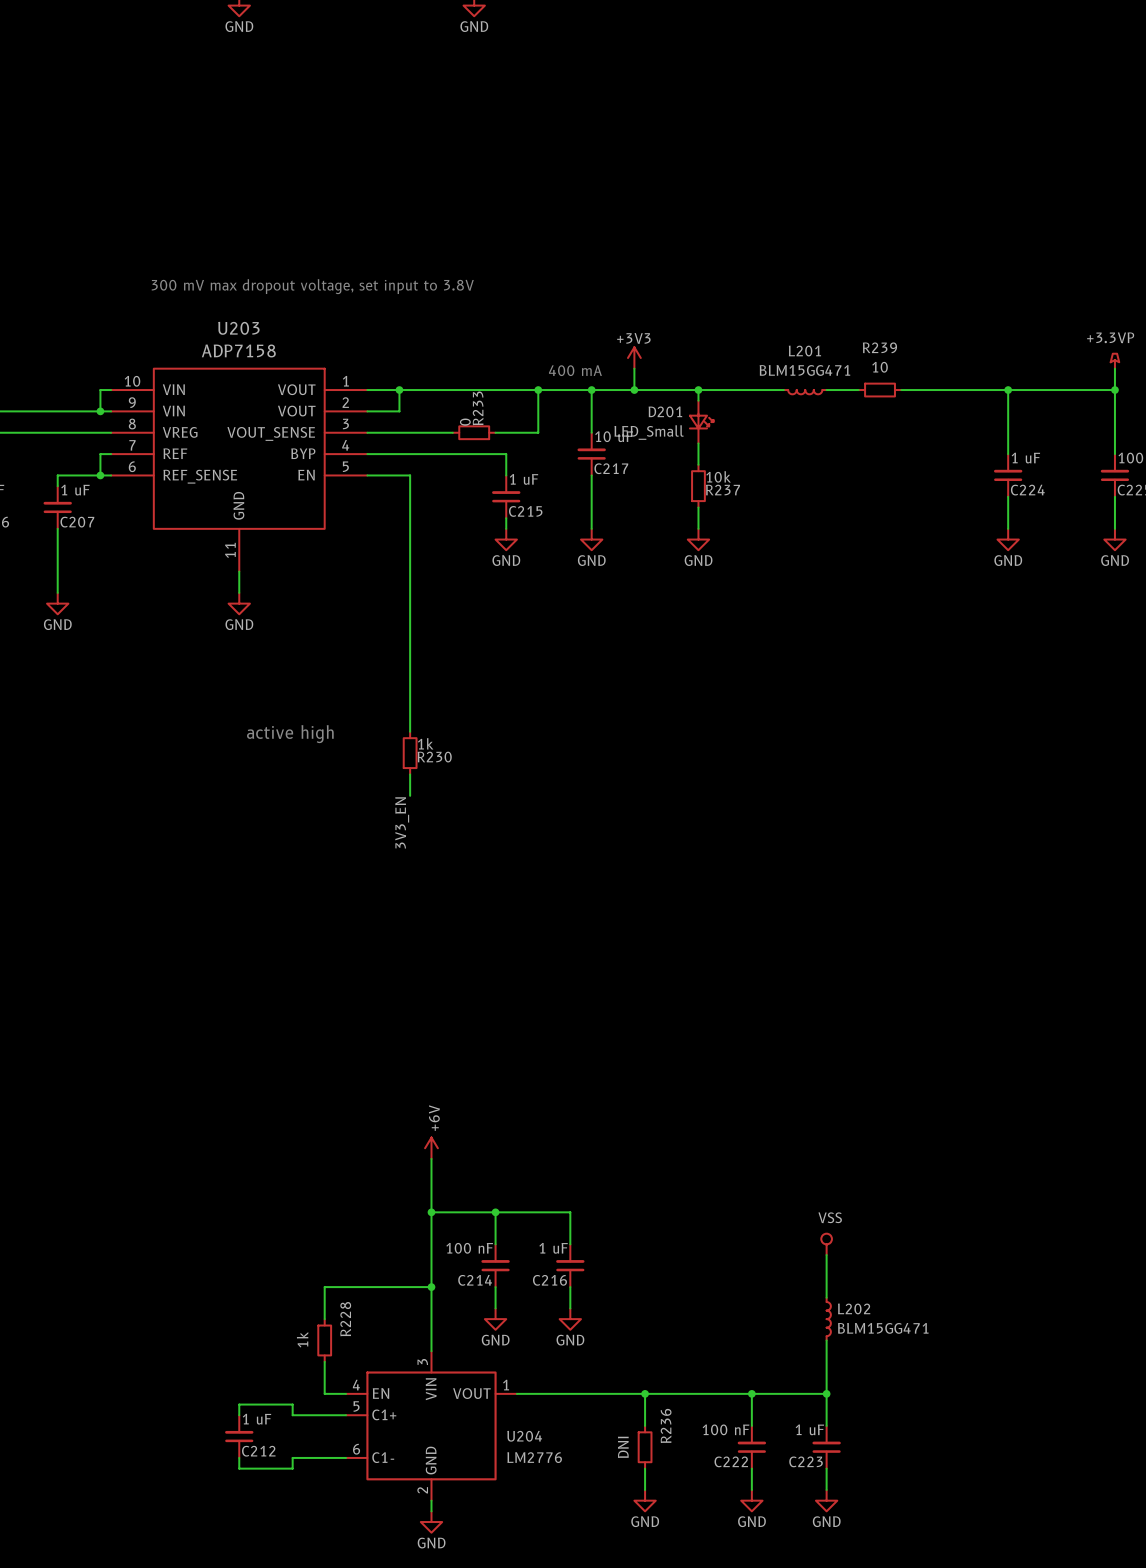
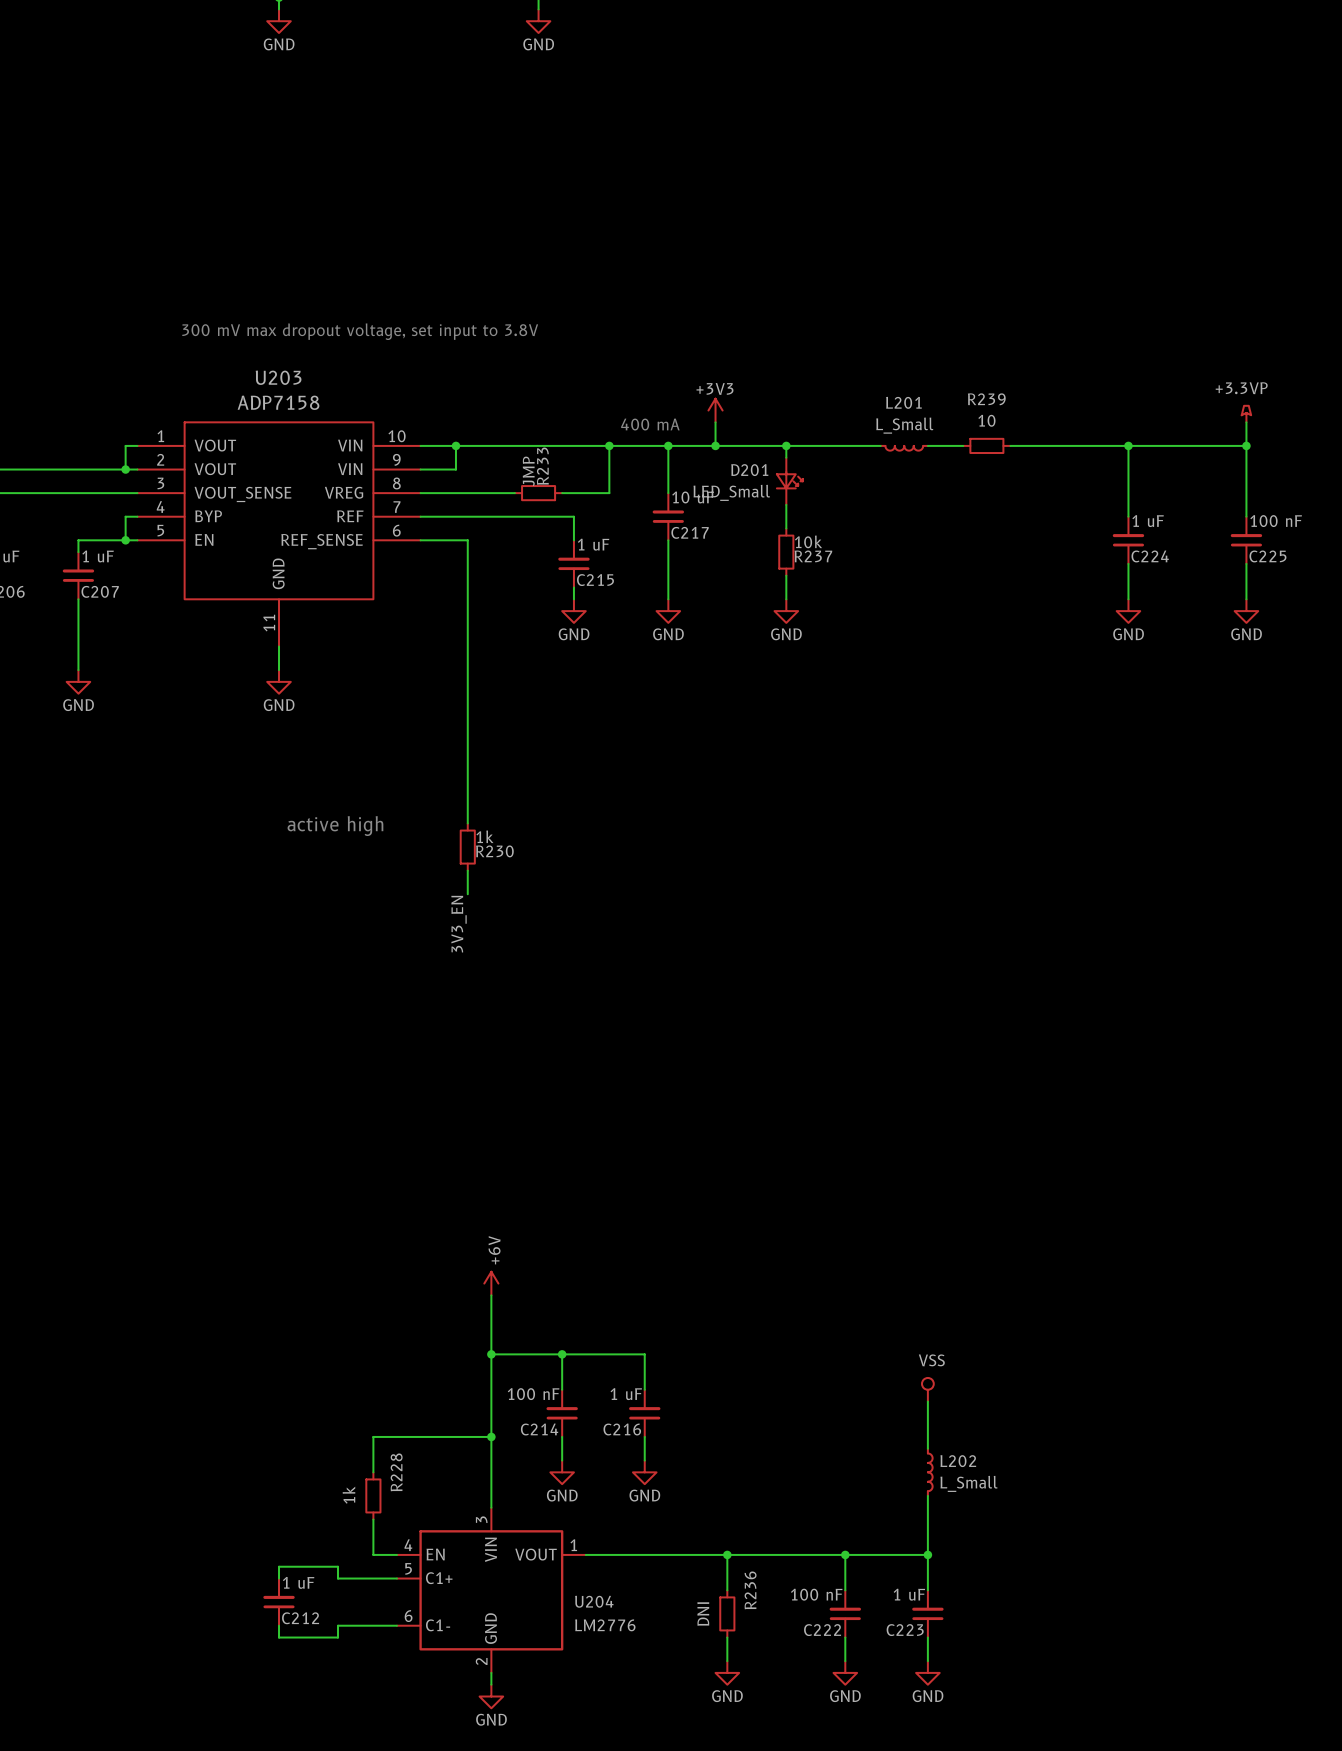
L201 value: BLM15GG471 (804, 370) -> L_Small (904, 425)
R233 value: 0 (465, 422) -> JMP (528, 471)
U203 flip: as is (239, 448) -> left-right (279, 510)
L202 value: BLM15GG471 (883, 1328) -> L_Small (969, 1483)

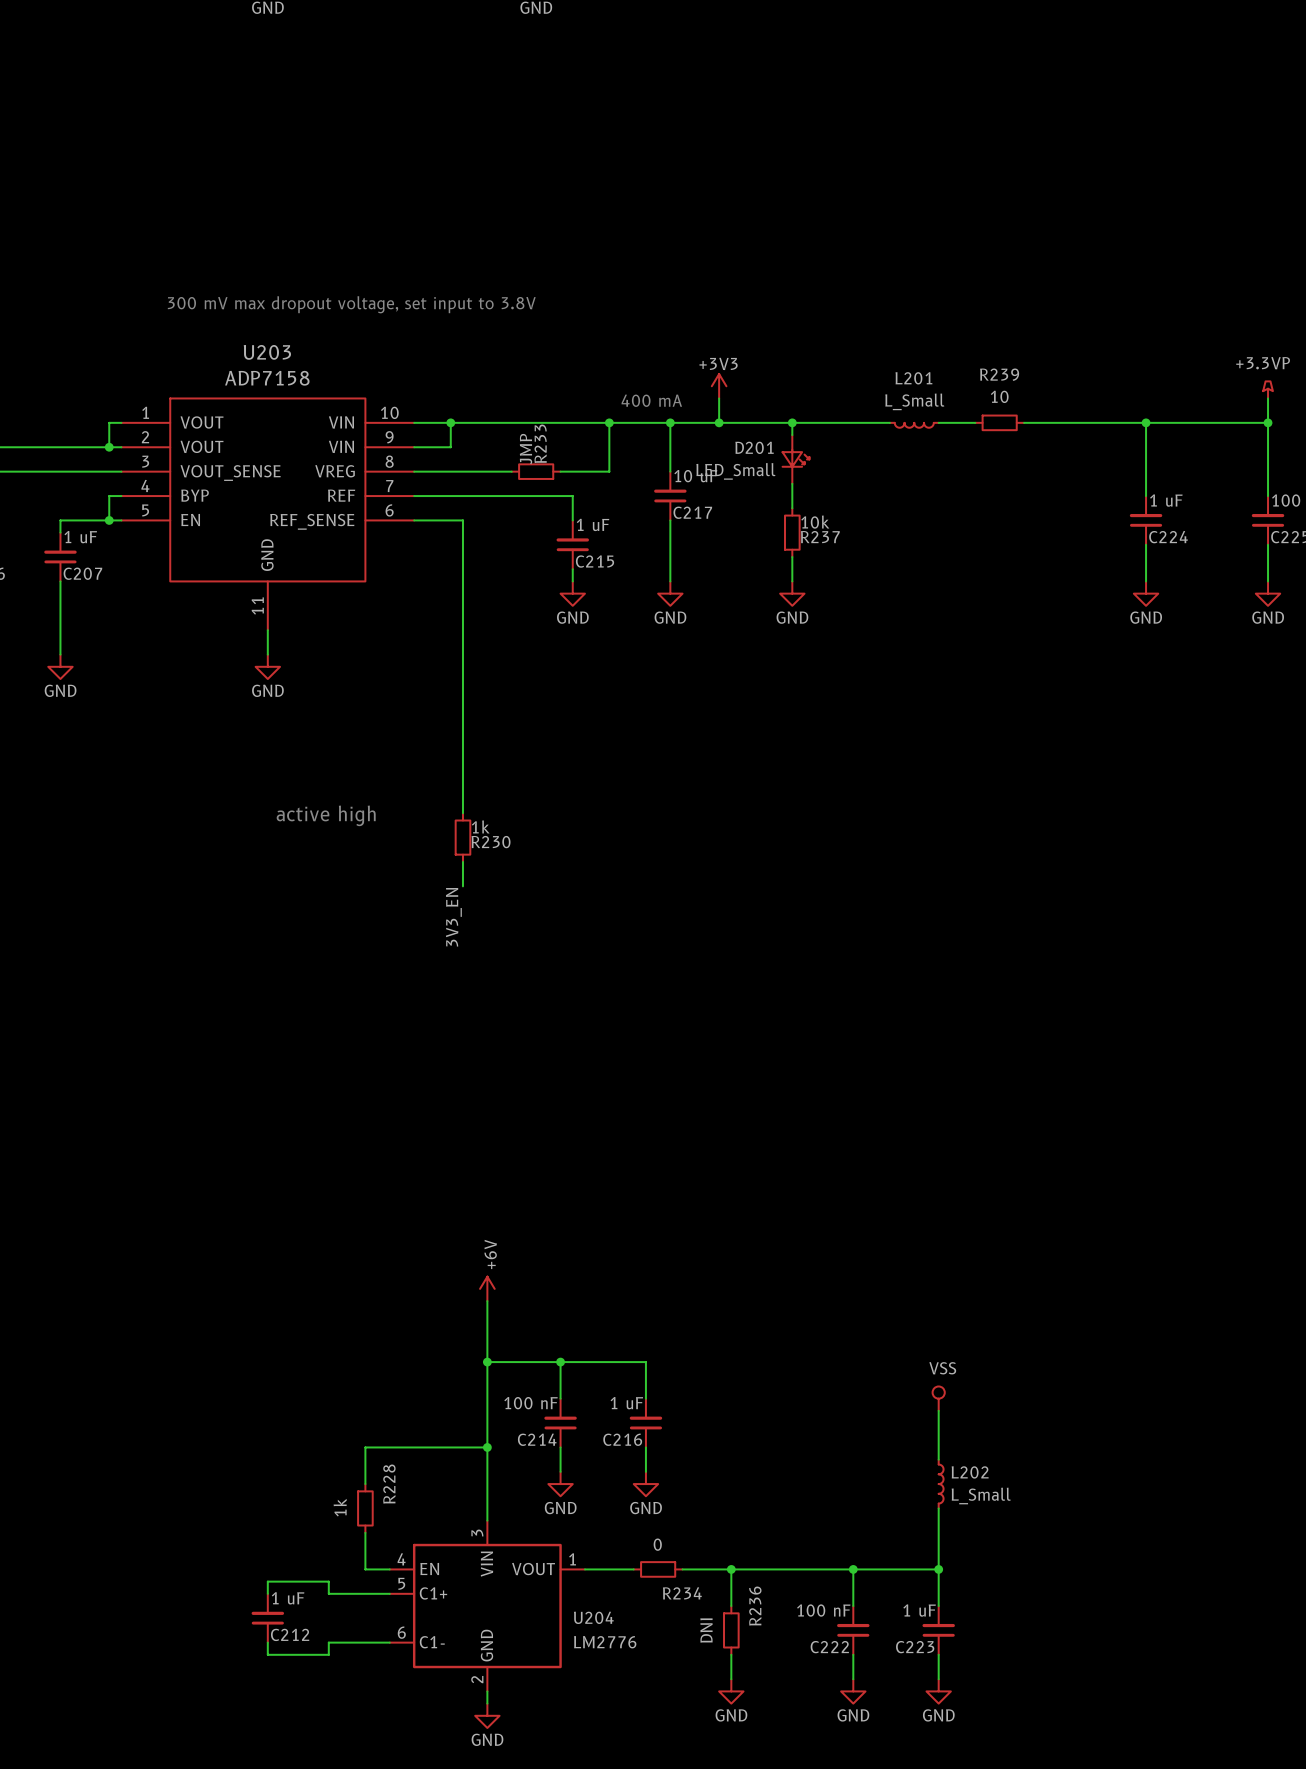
wire: (632, 1554) (680, 1554) -> none
R234: none -> 0 (658, 1569)

